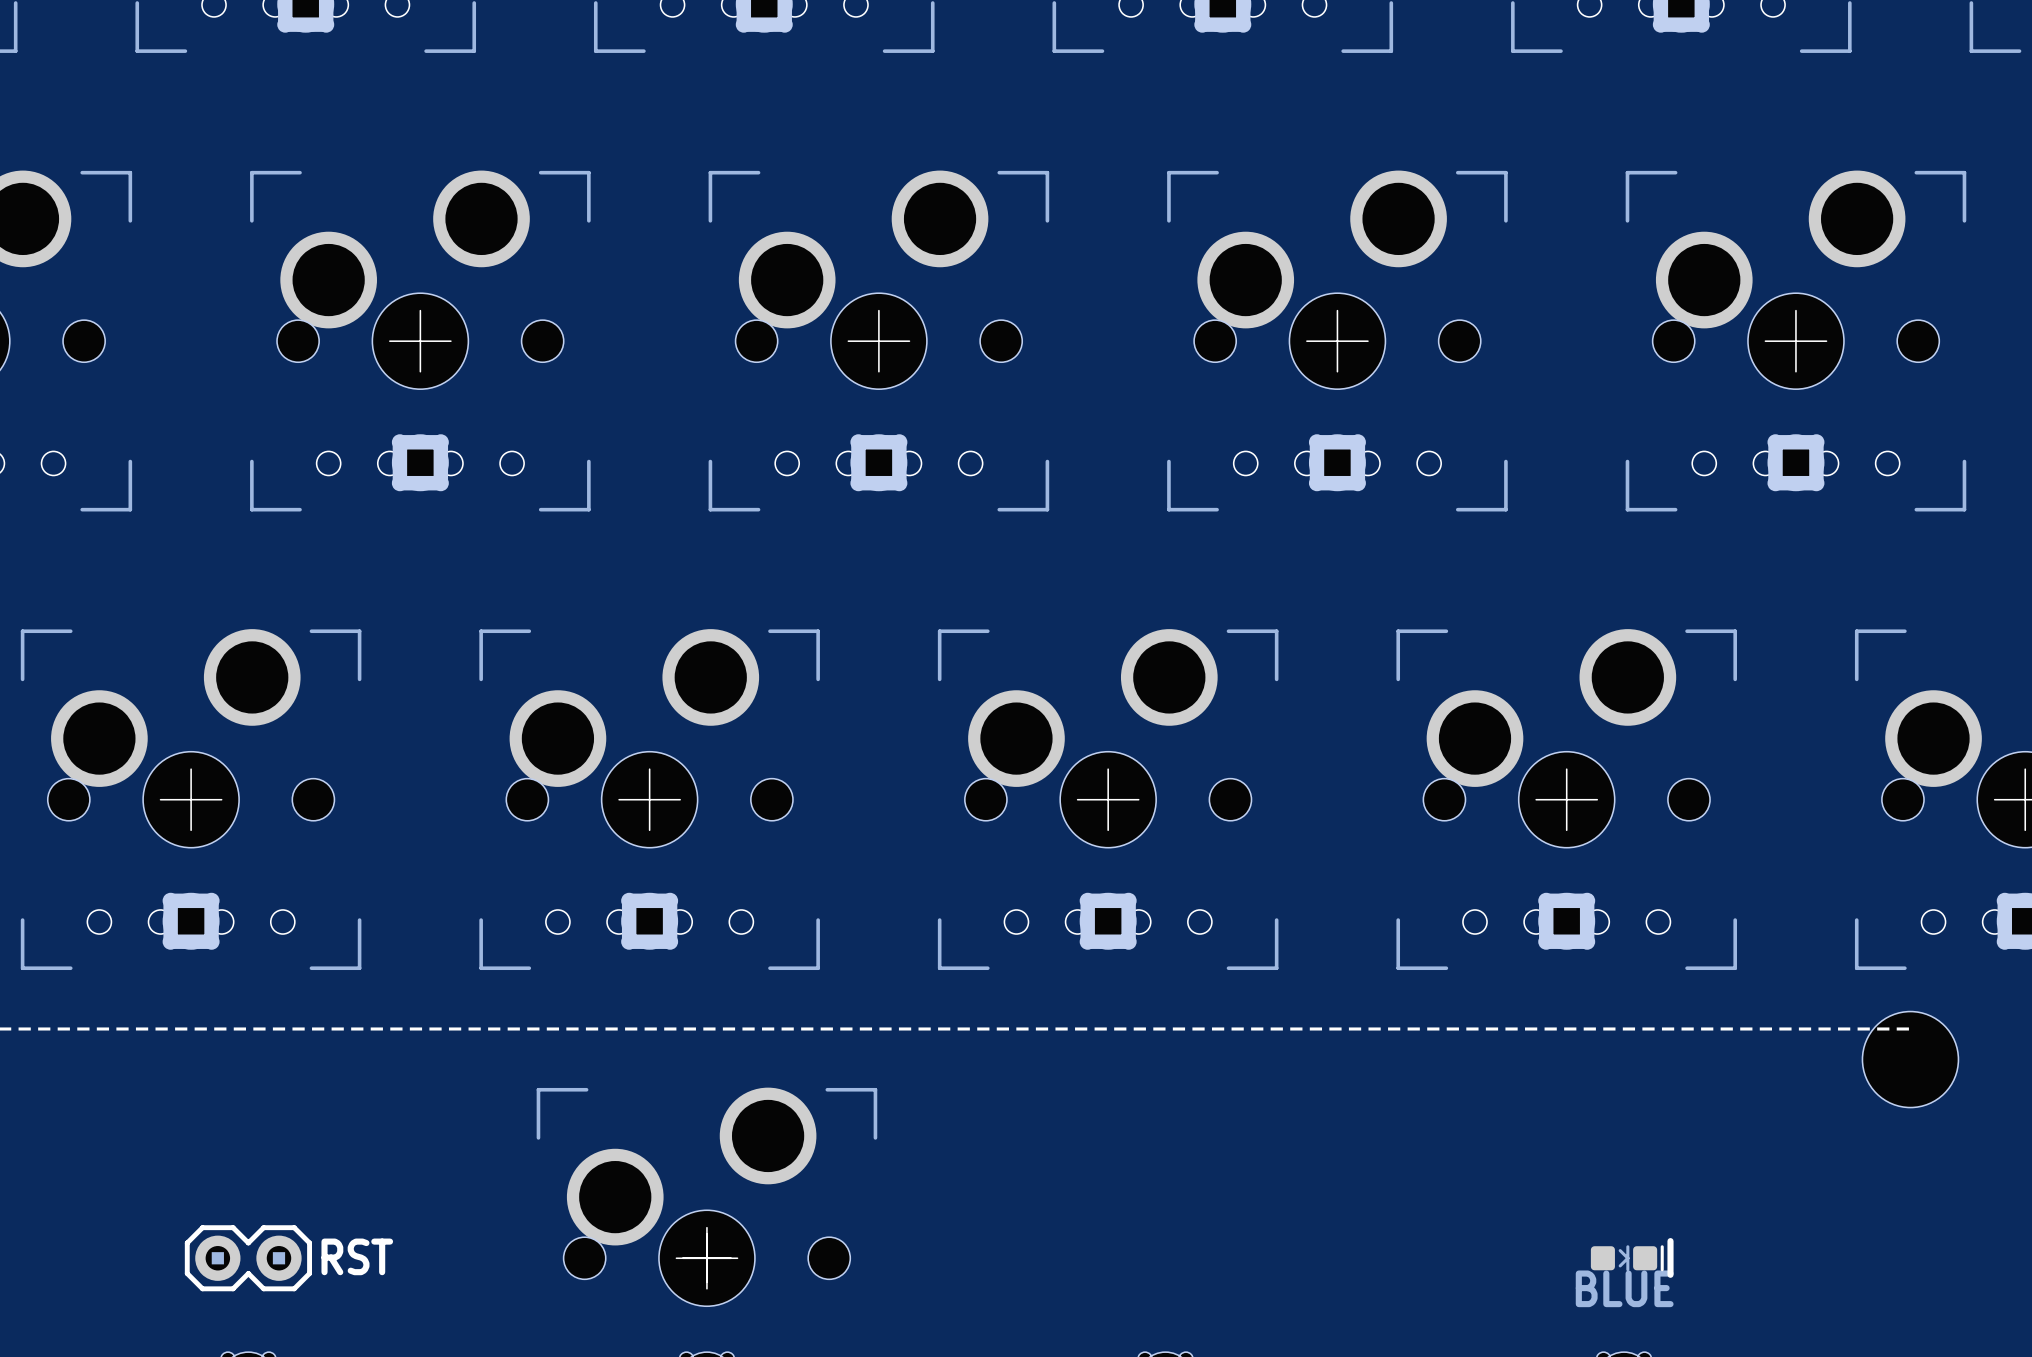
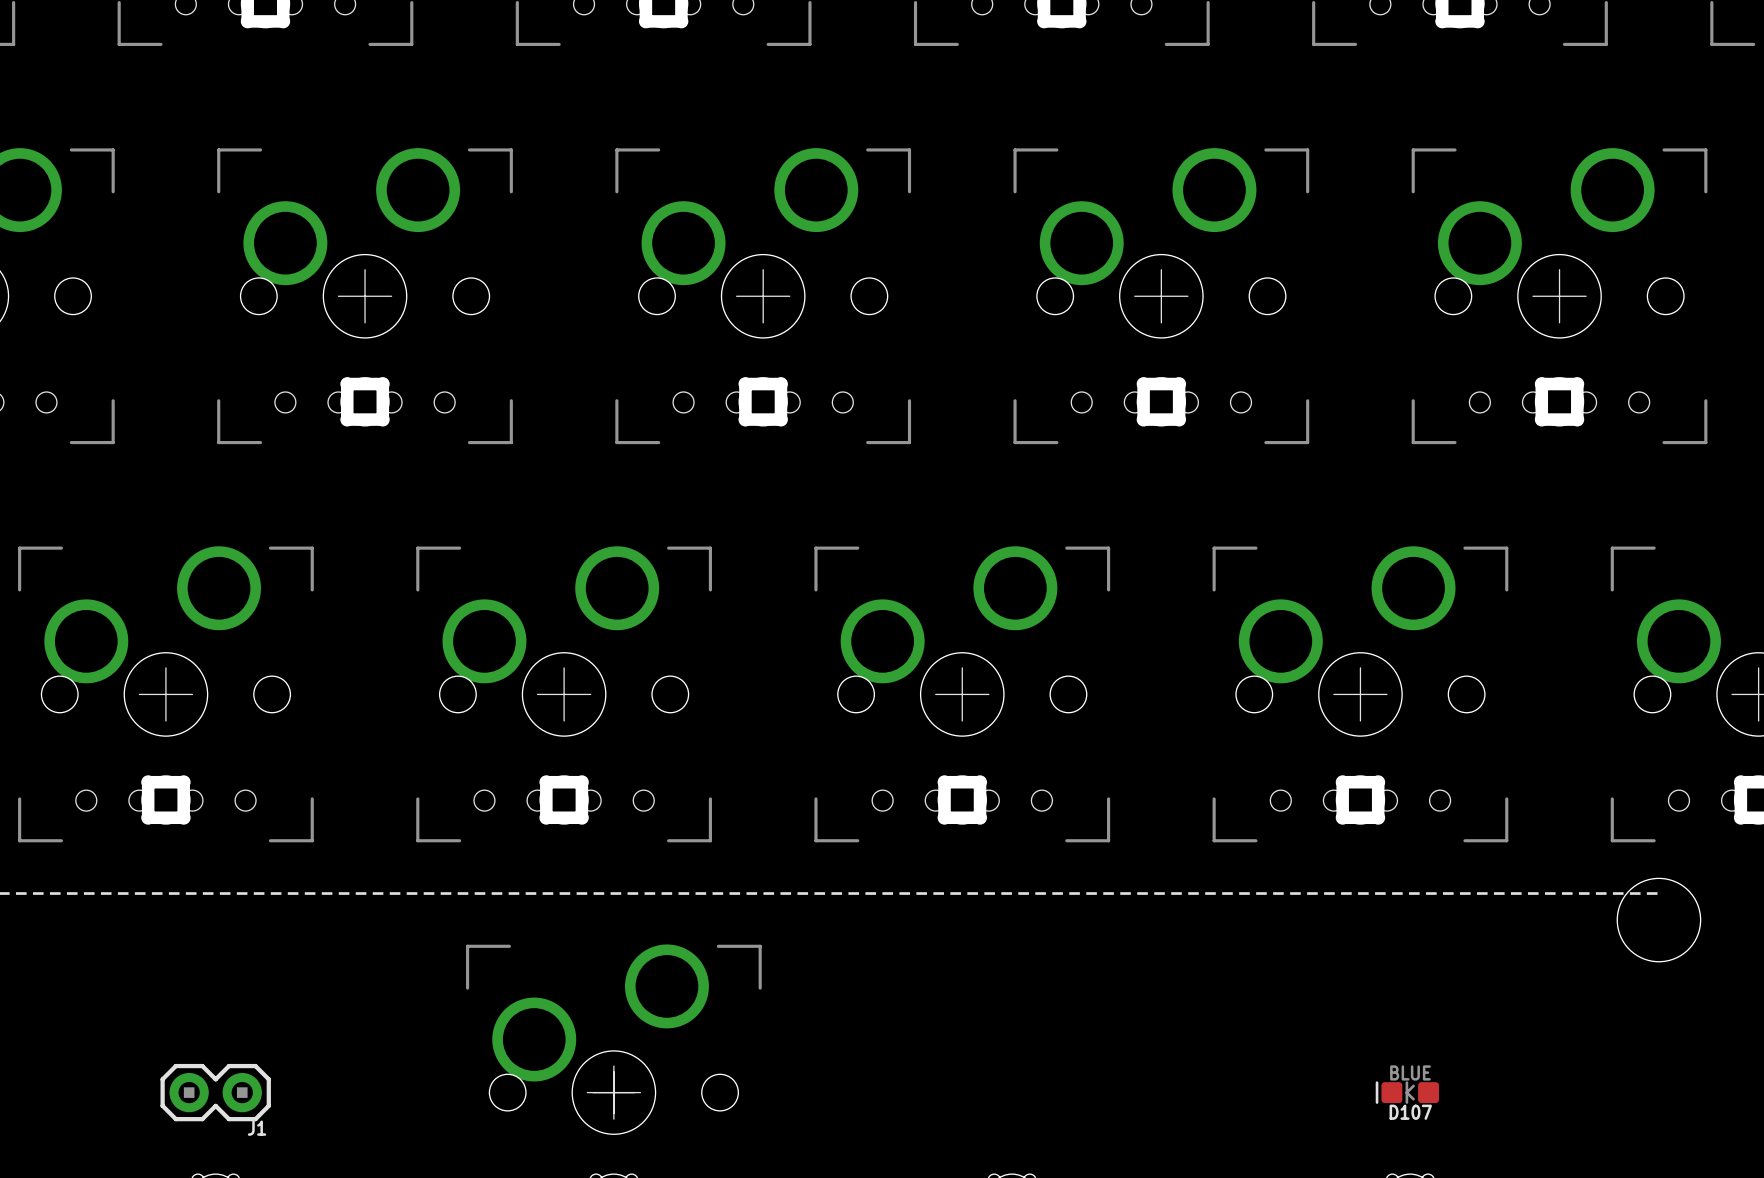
line: (1670, 1241) (1670, 1274) -> none
RST name: RST (357, 1256) -> J1 (257, 1128)
D107: none -> BLUE (1407, 1092)
part: BLUE (1627, 1258) -> none

